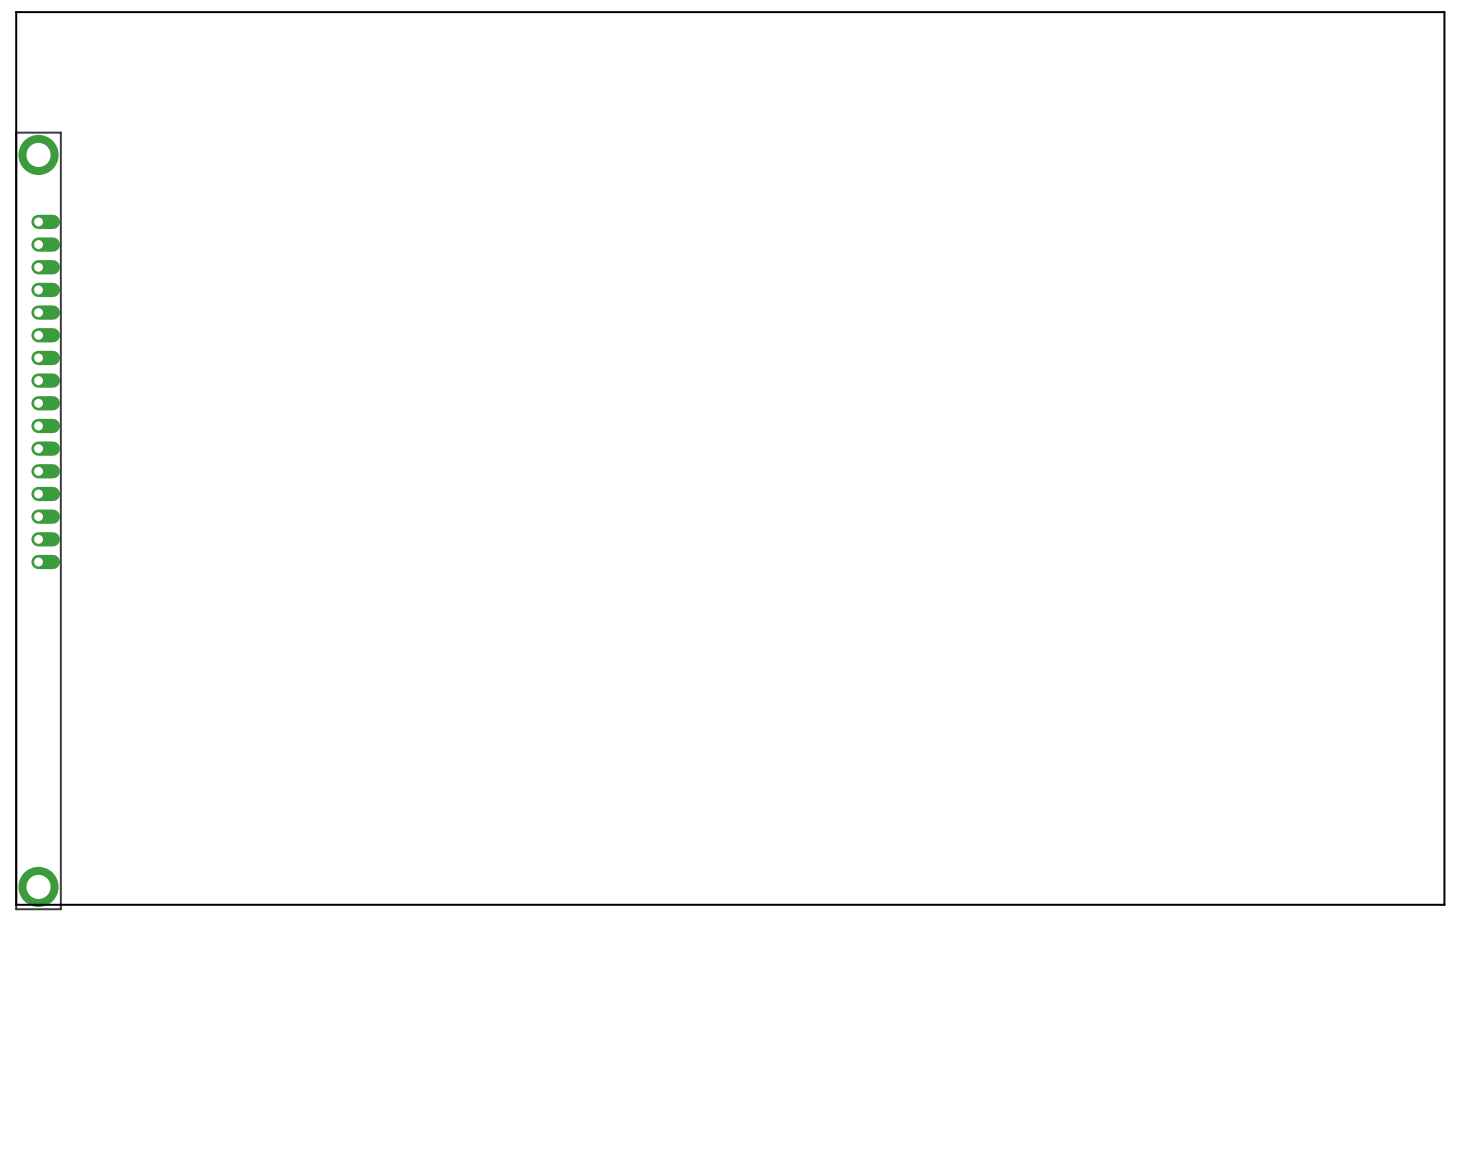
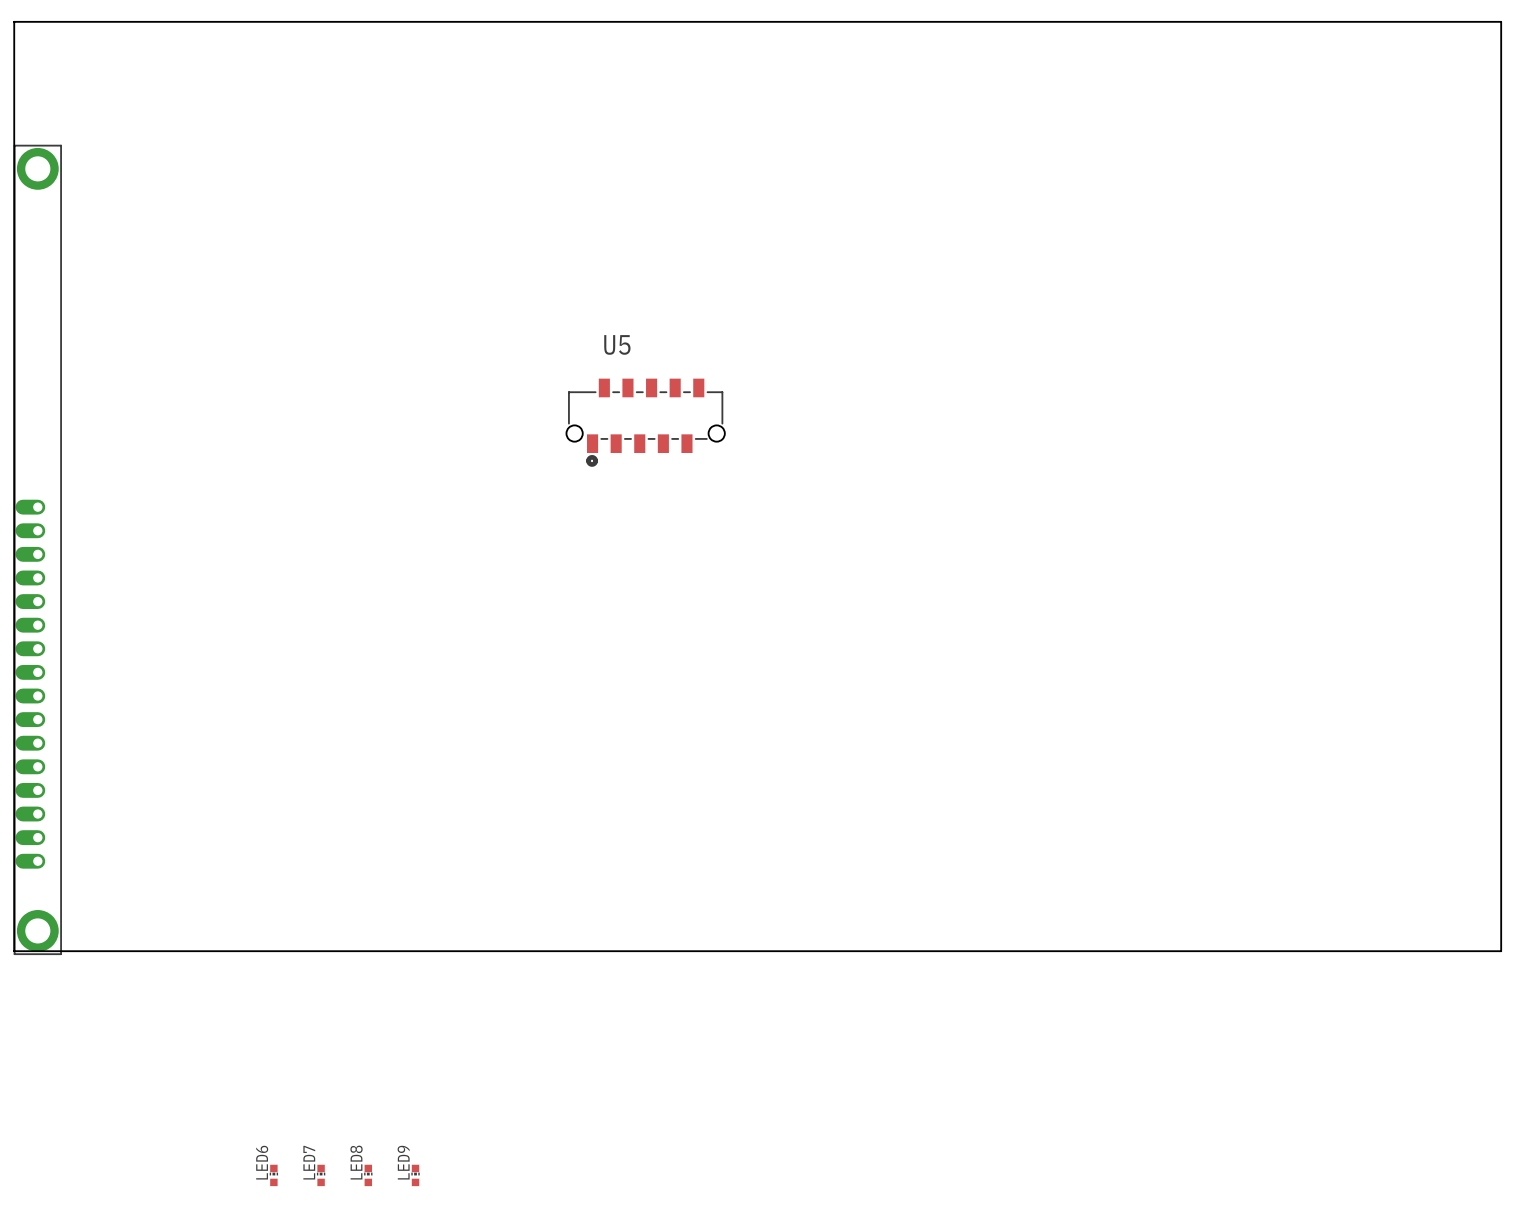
U5: none -> (645, 422)
part rotation: 0° (38, 520) -> 180° (37, 549)
LED6: none -> (273, 1175)
LED7: none -> (321, 1175)
LED8: none -> (368, 1175)
LED9: none -> (415, 1175)

